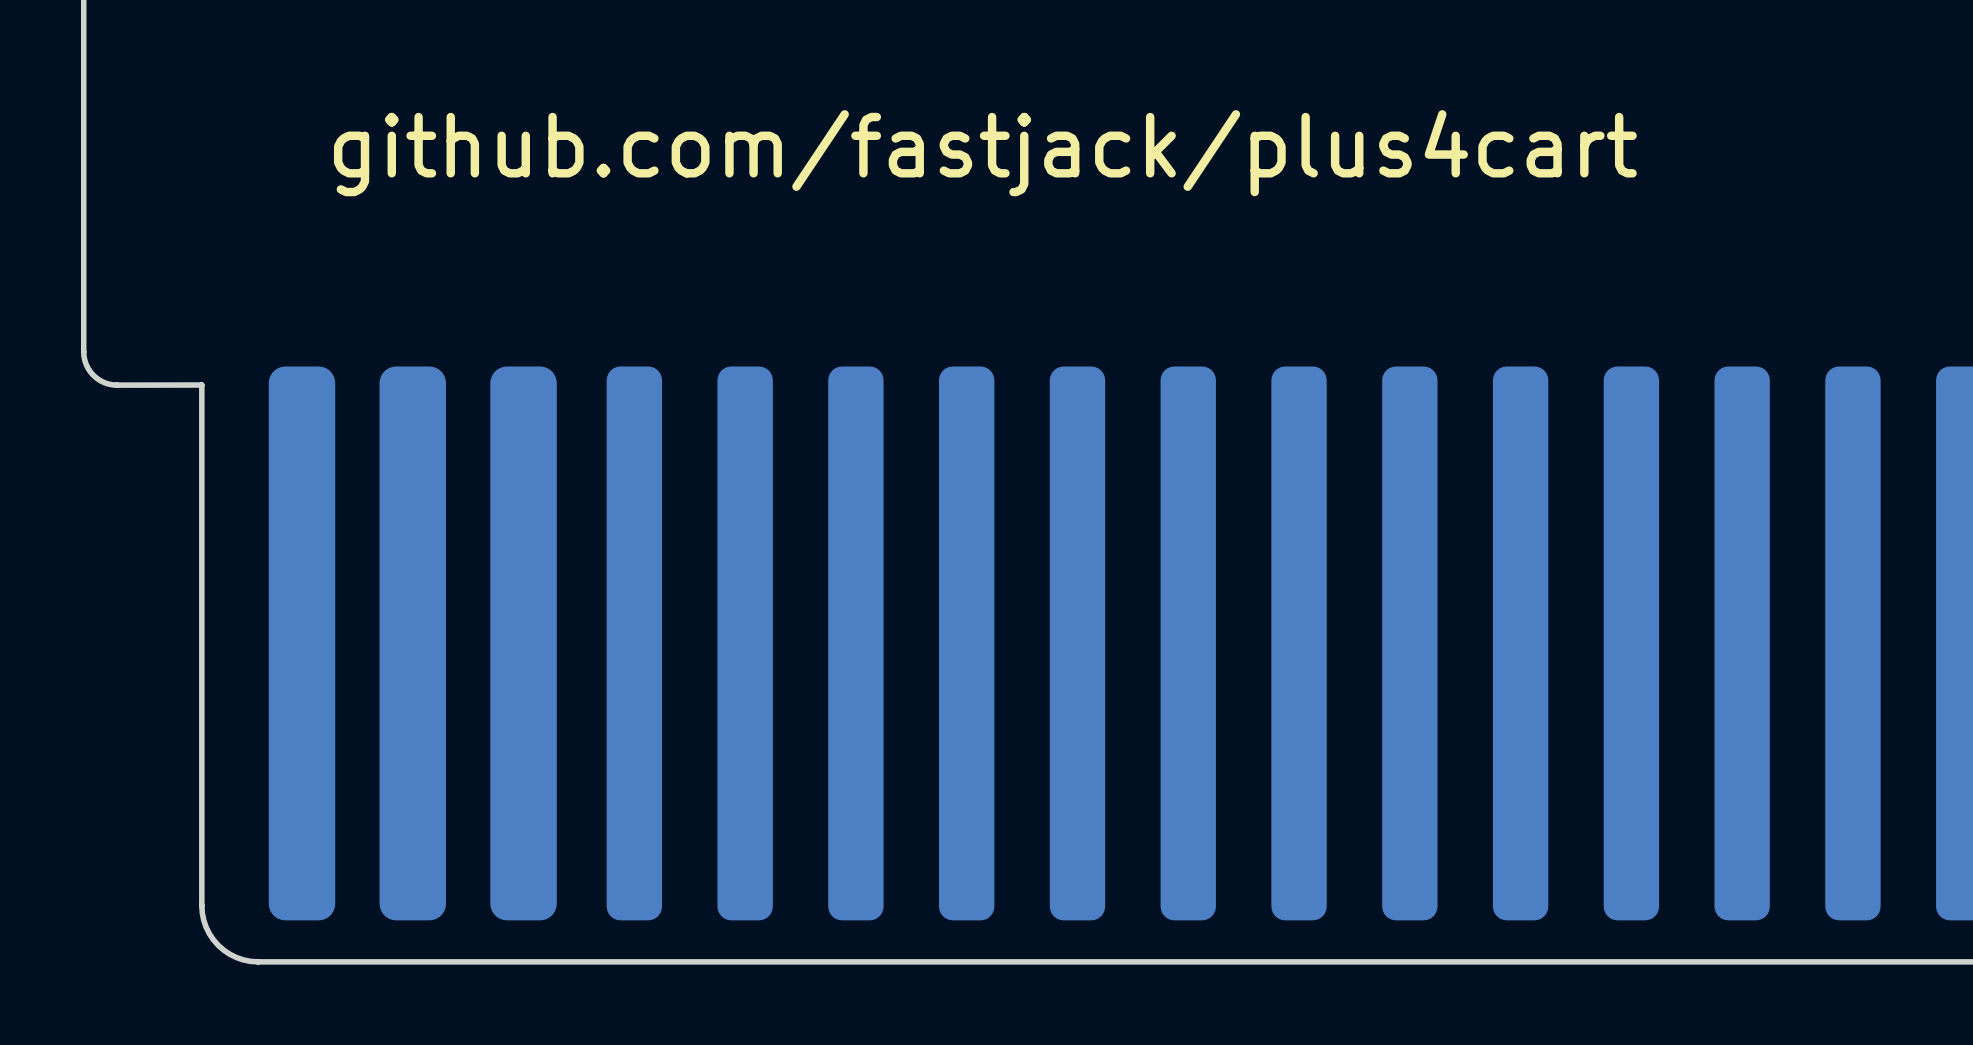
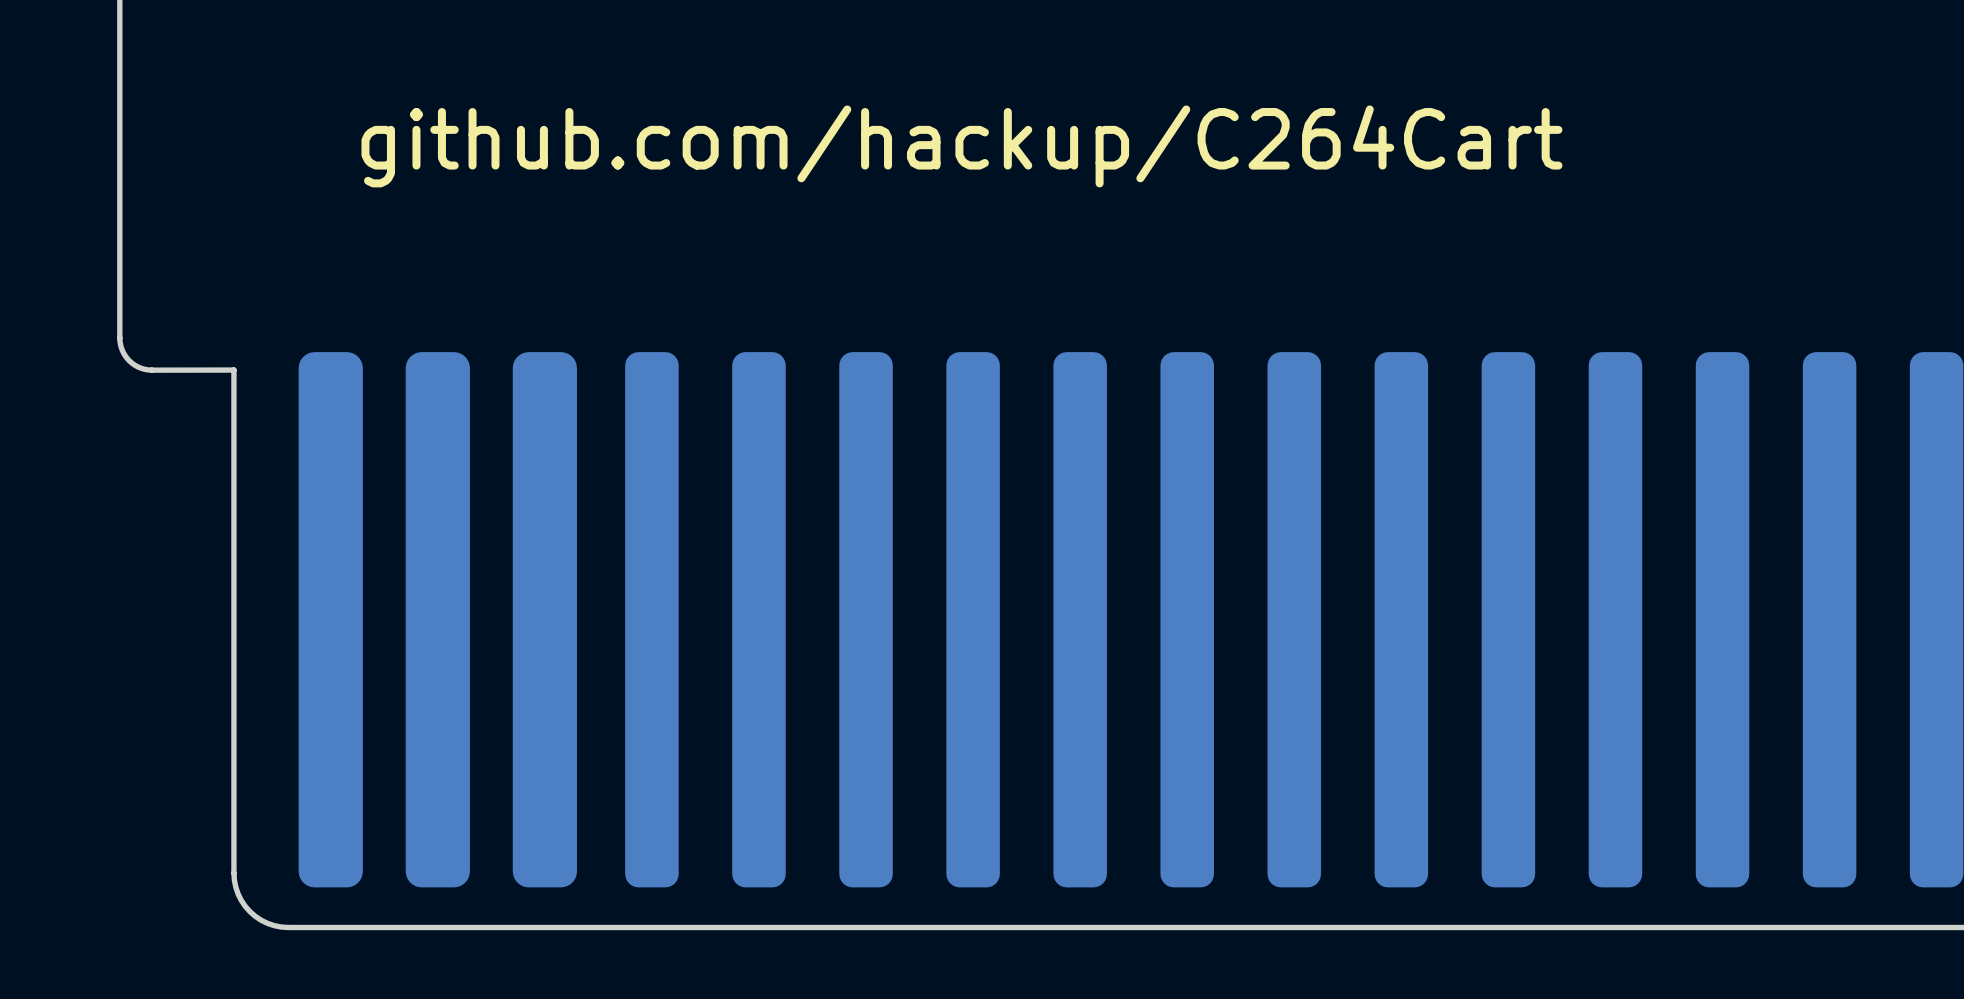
text: github.com/fastjack/plus4cart (985, 153) -> github.com/hackup/C264Cart (961, 146)

